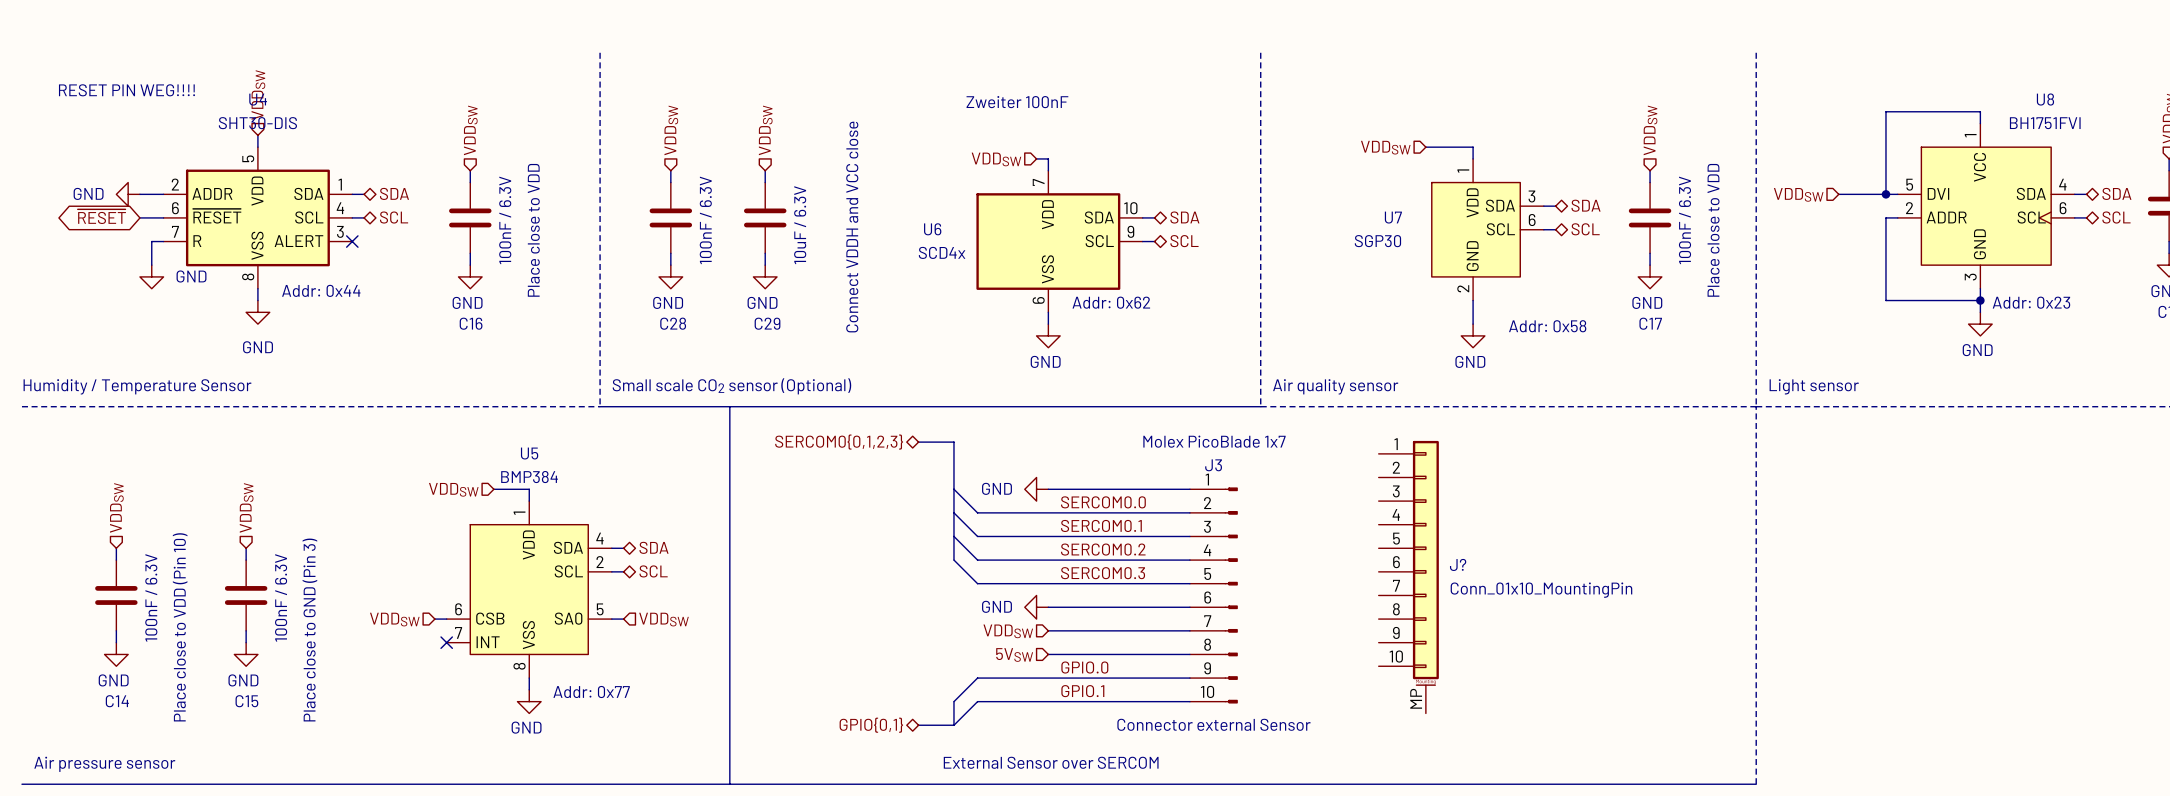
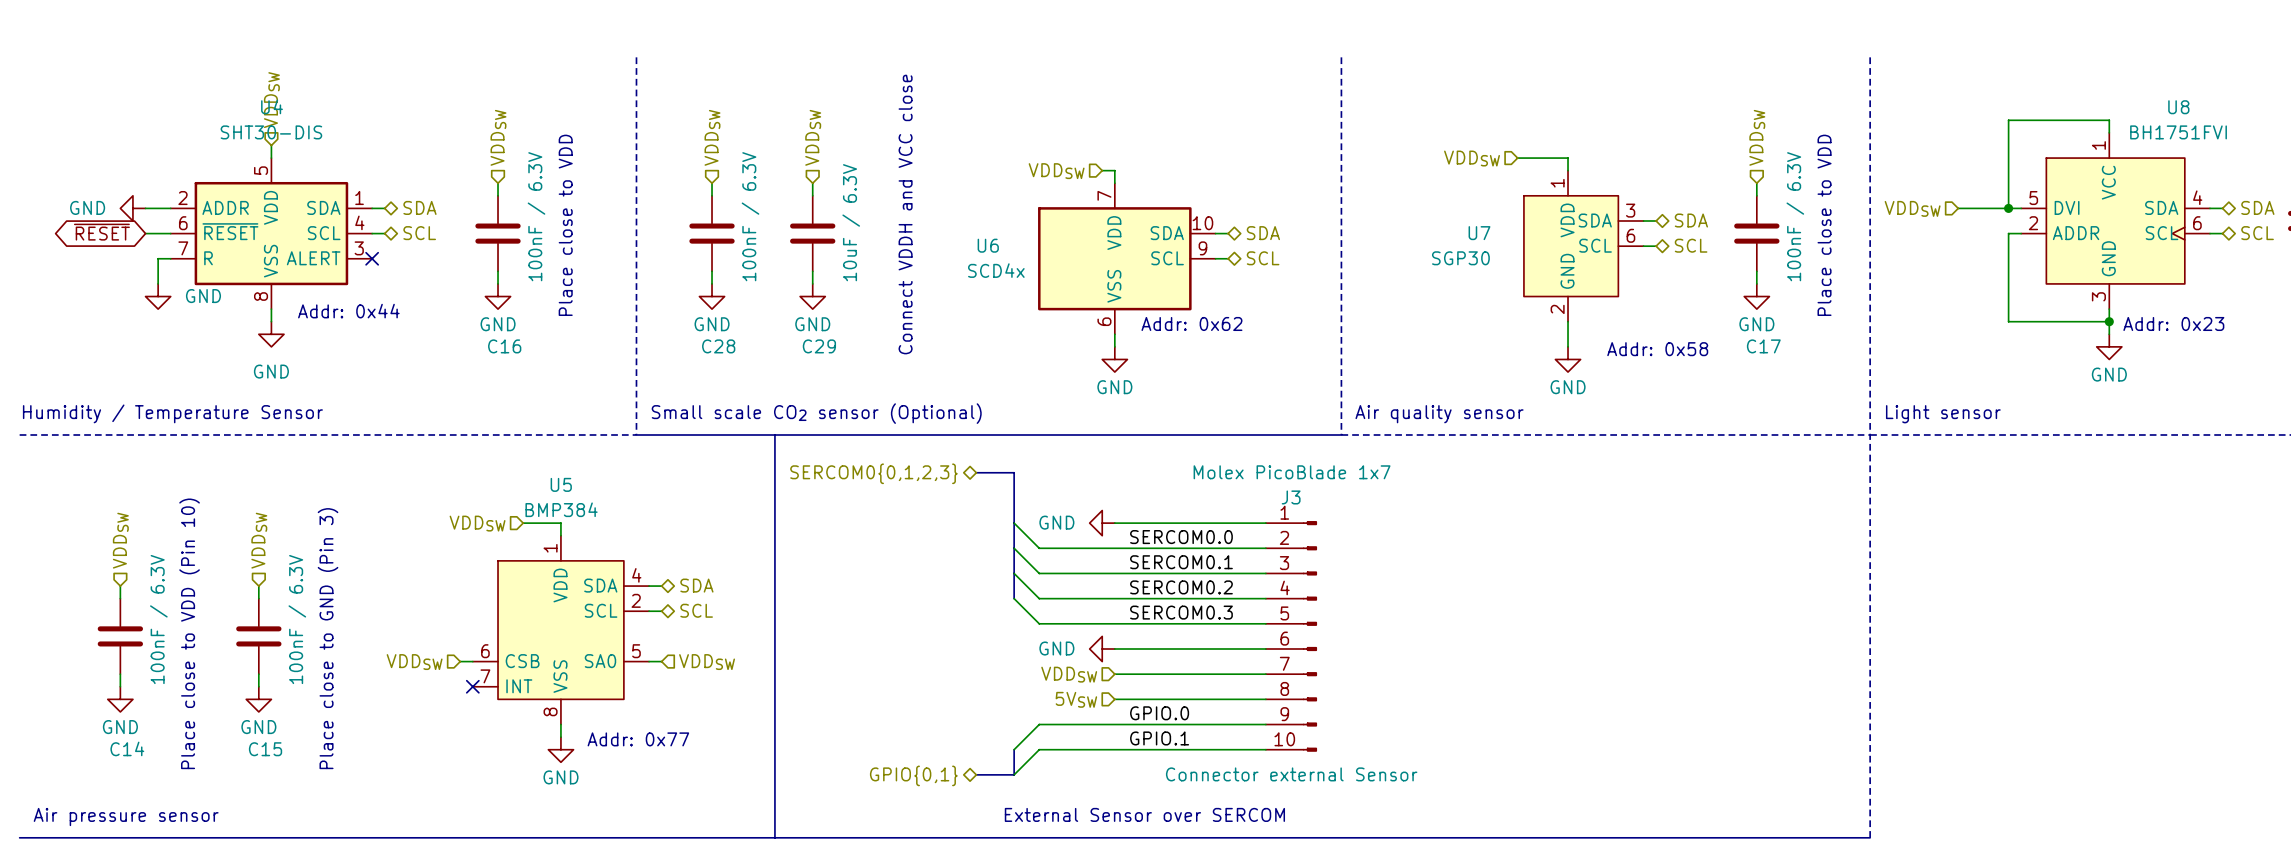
text: RESET PIN WEG!!!! (126, 90) -> none
text: Zweiter 100nF (1017, 102) -> none
J?: Conn_01x10_MountingPin (1408, 577) -> none

